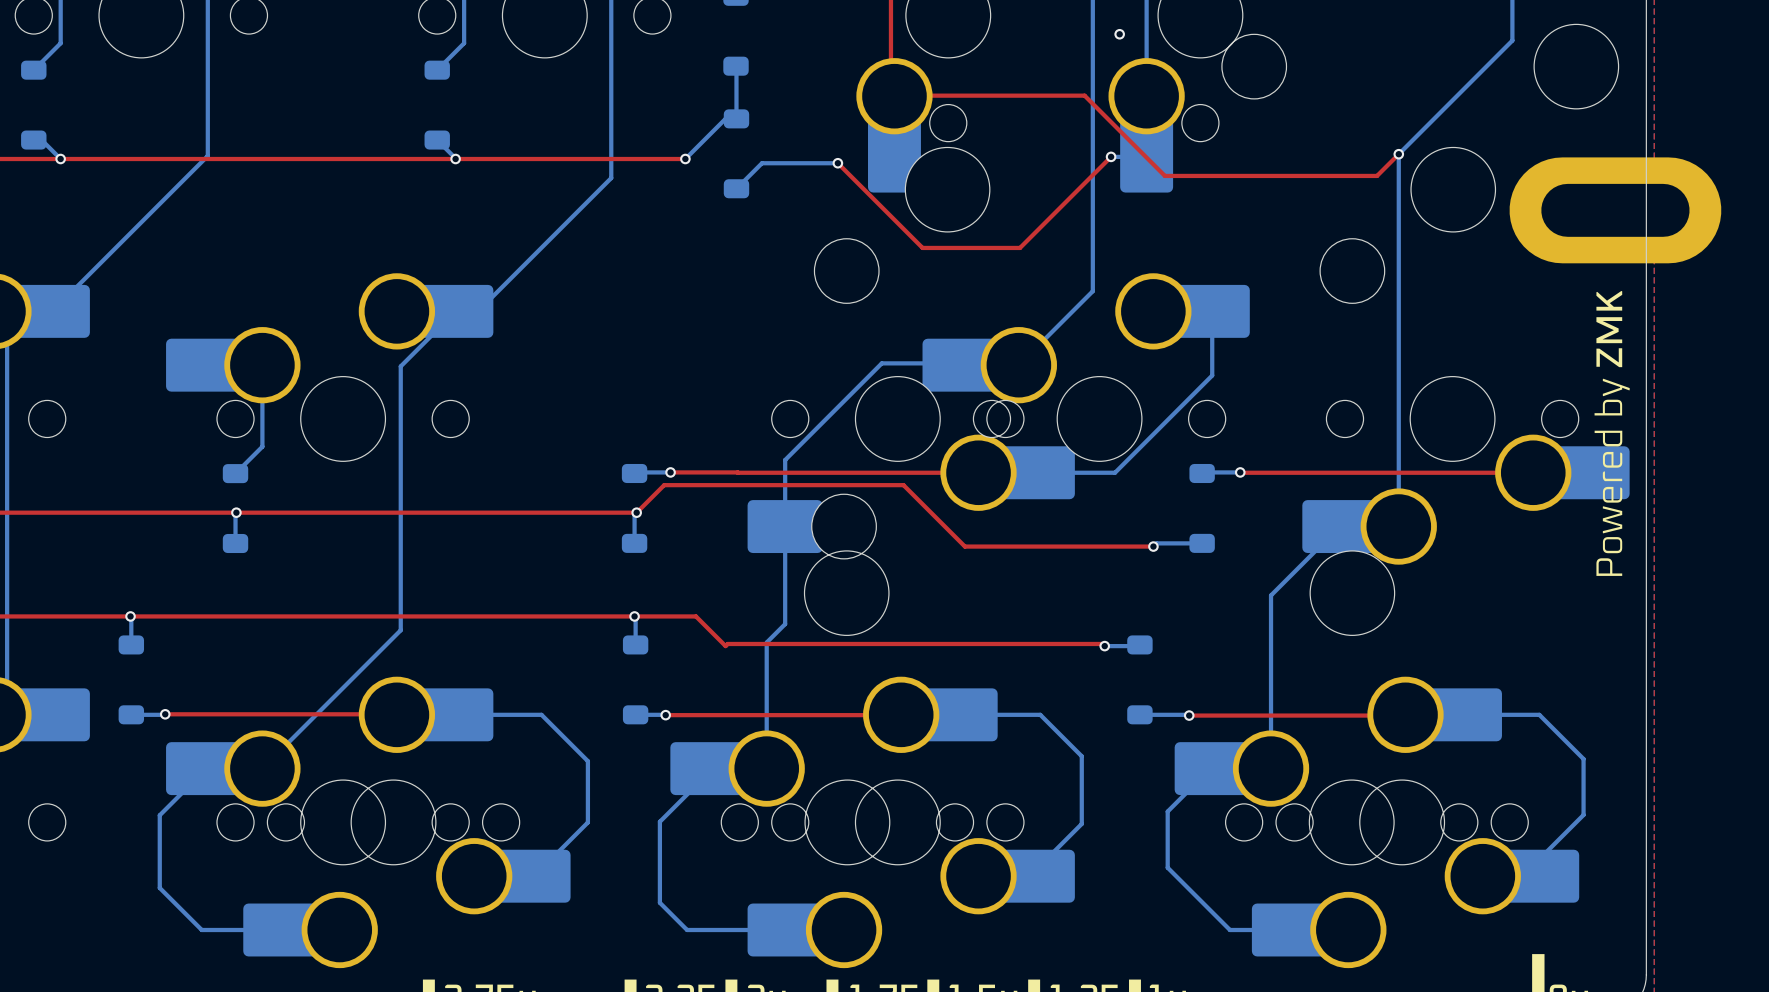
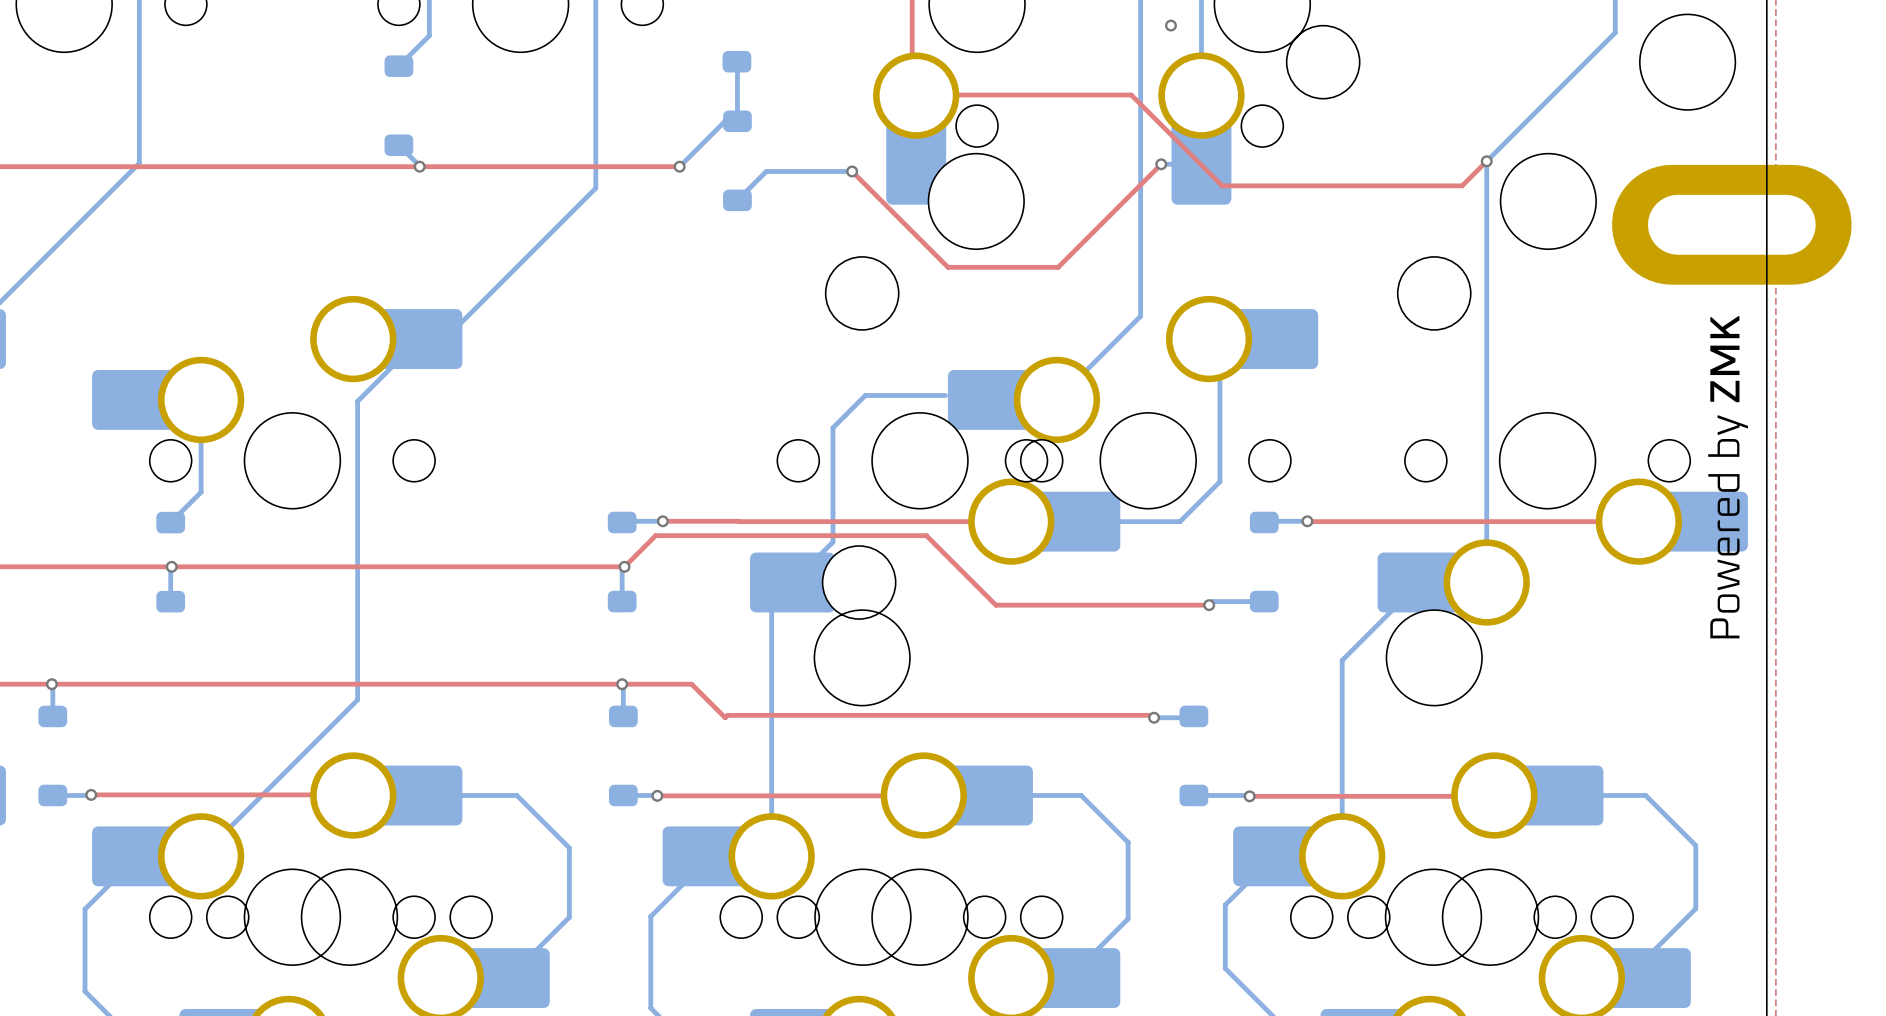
bottom track: (1212, 311) (1212, 375) (1114, 472) -> (1209, 339) (1219, 349) (1219, 481) (1180, 521) (1165, 521)
bottom track: (958, 363) (881, 363) (785, 460) (785, 624) (766, 642) -> (945, 395) (865, 395) (832, 427) (832, 542) (771, 603) (771, 713)

